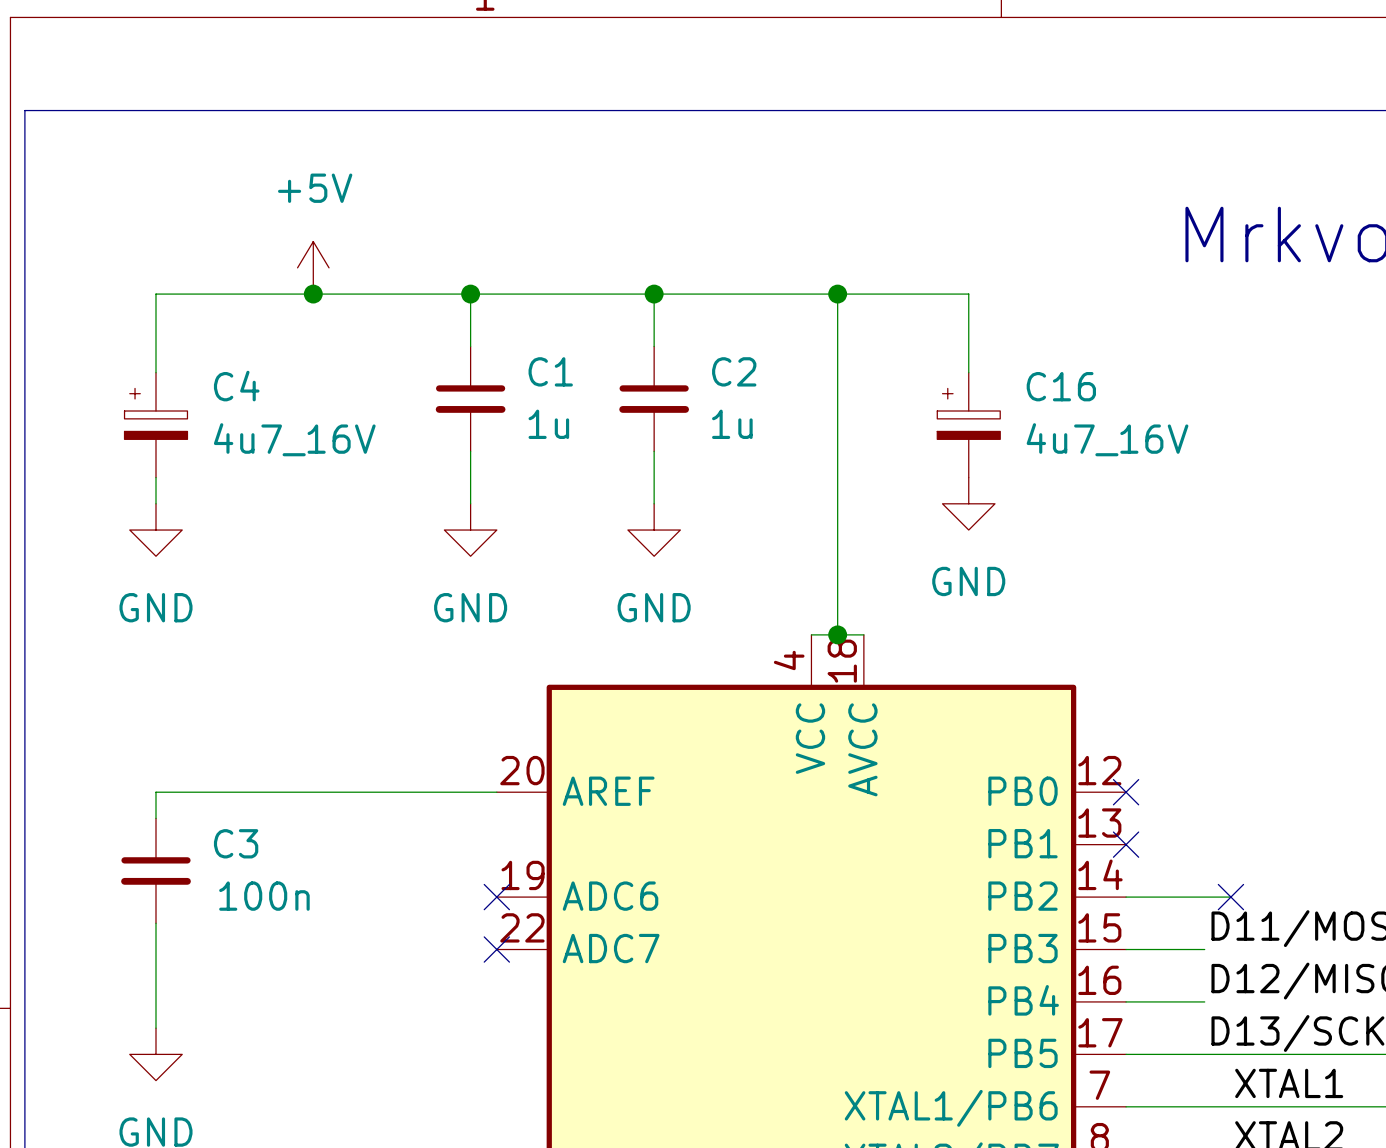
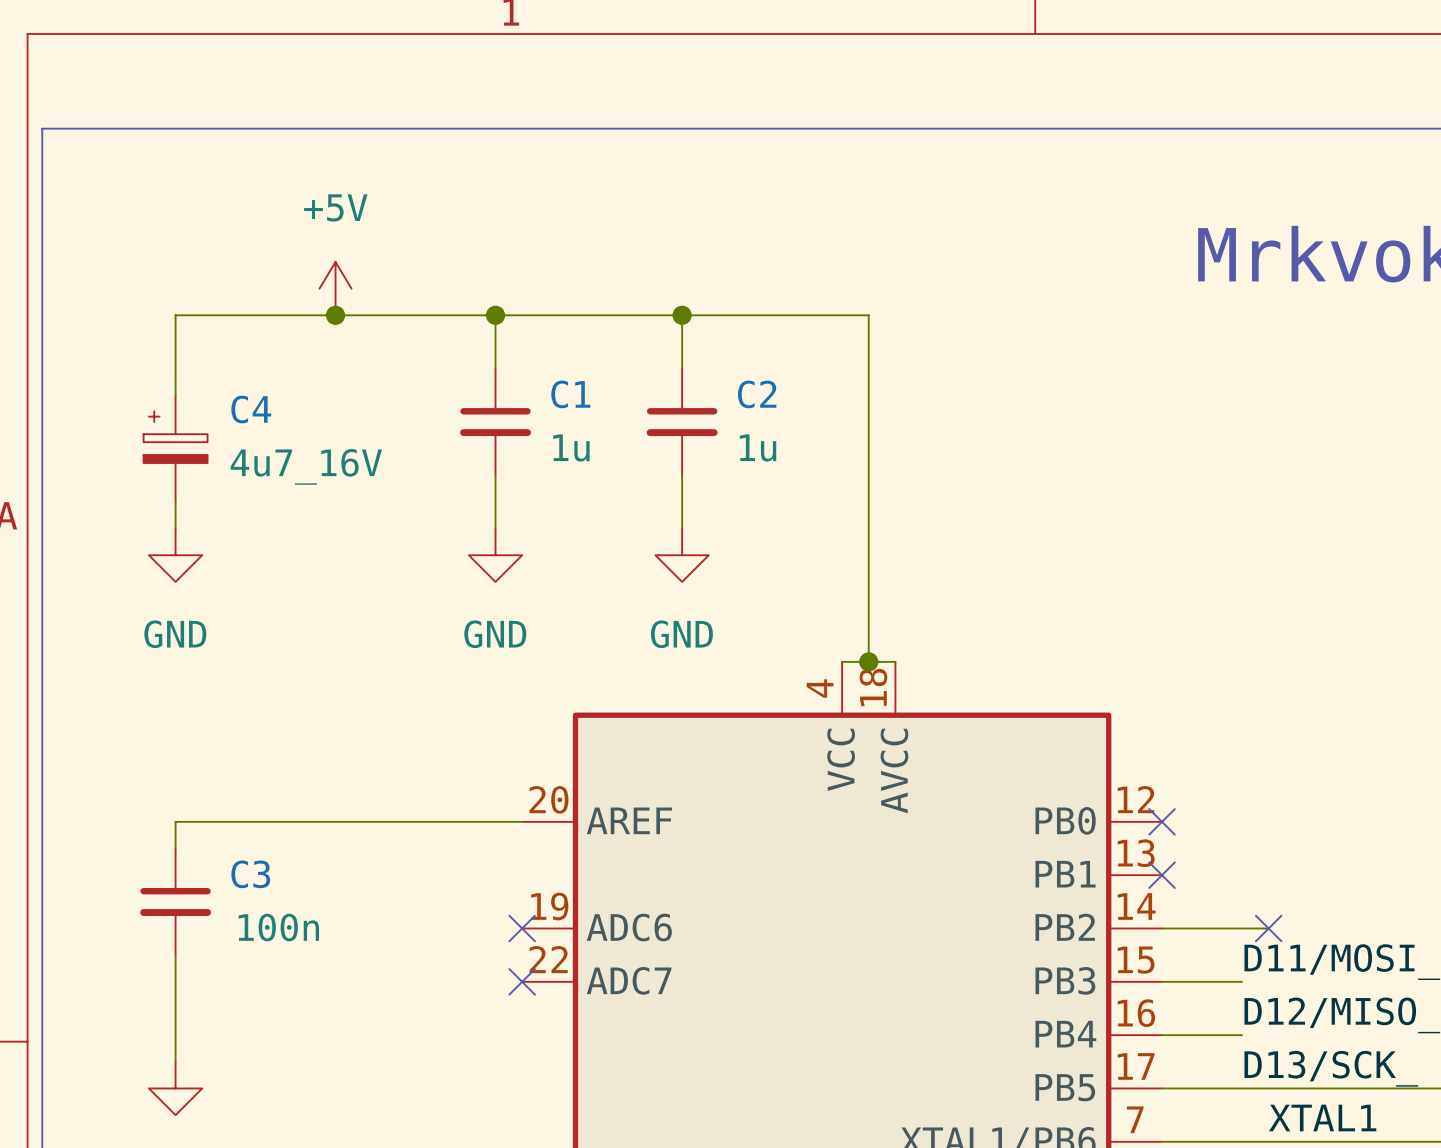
wire: (837, 294) (968, 294) (968, 372) -> none
junction: (837, 294) -> none
C16: 4u7_16V (968, 425) -> none
power symbol: GND (968, 503) -> none

